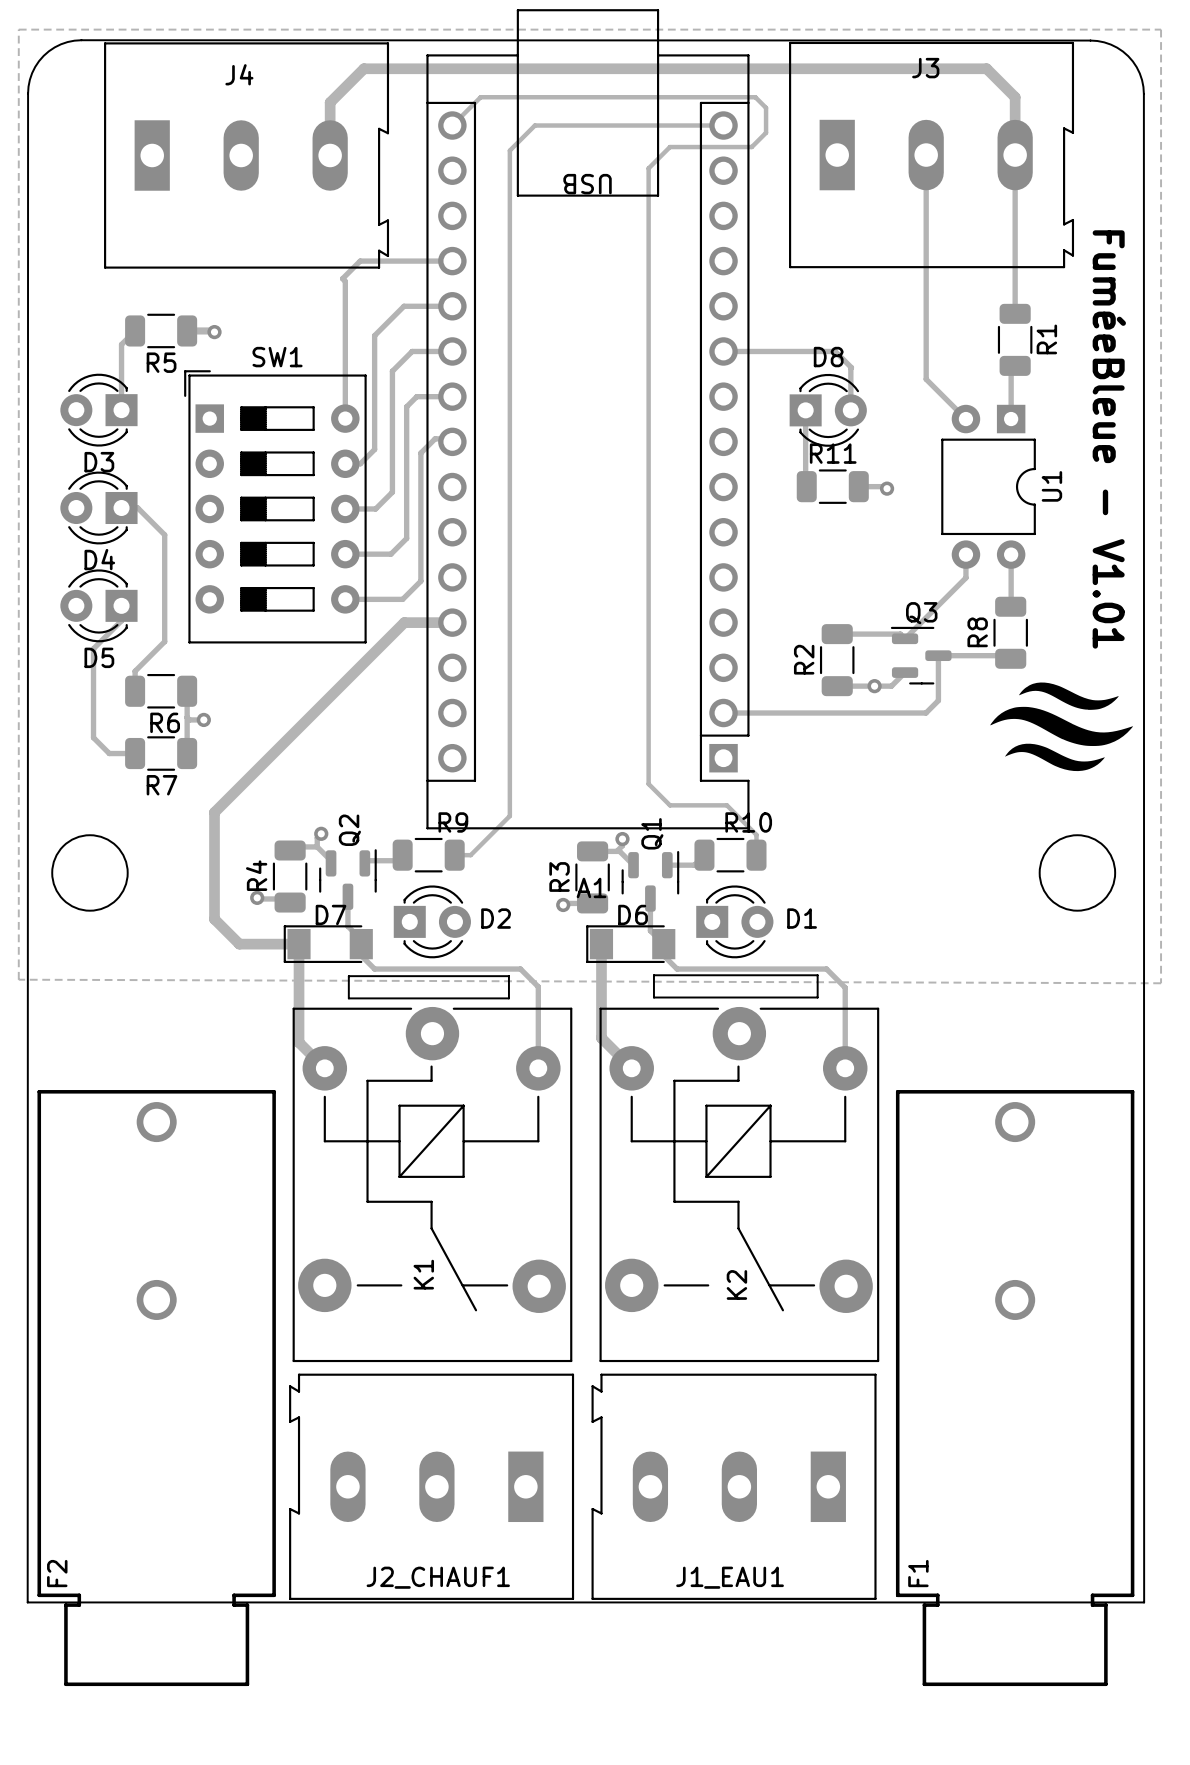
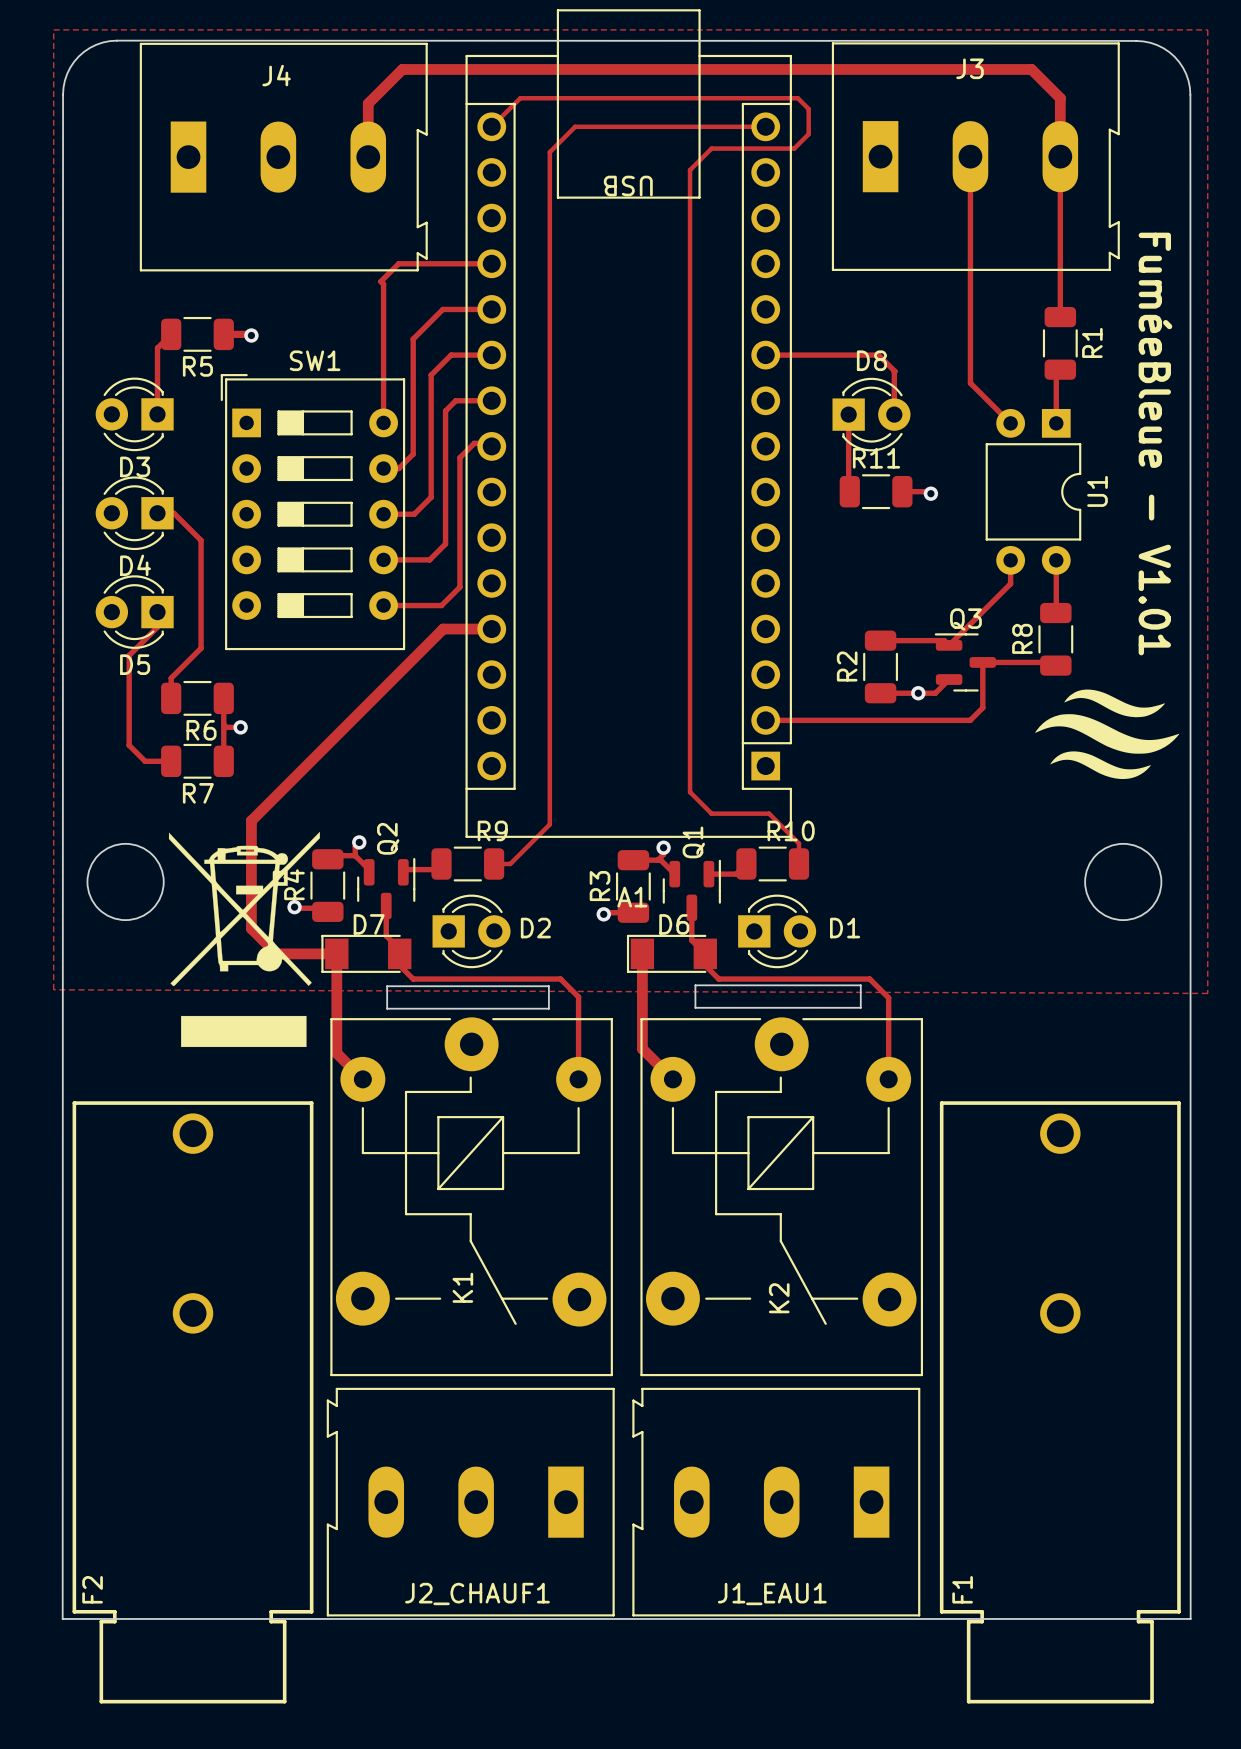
drawing: none -> [168, 831, 320, 1048]

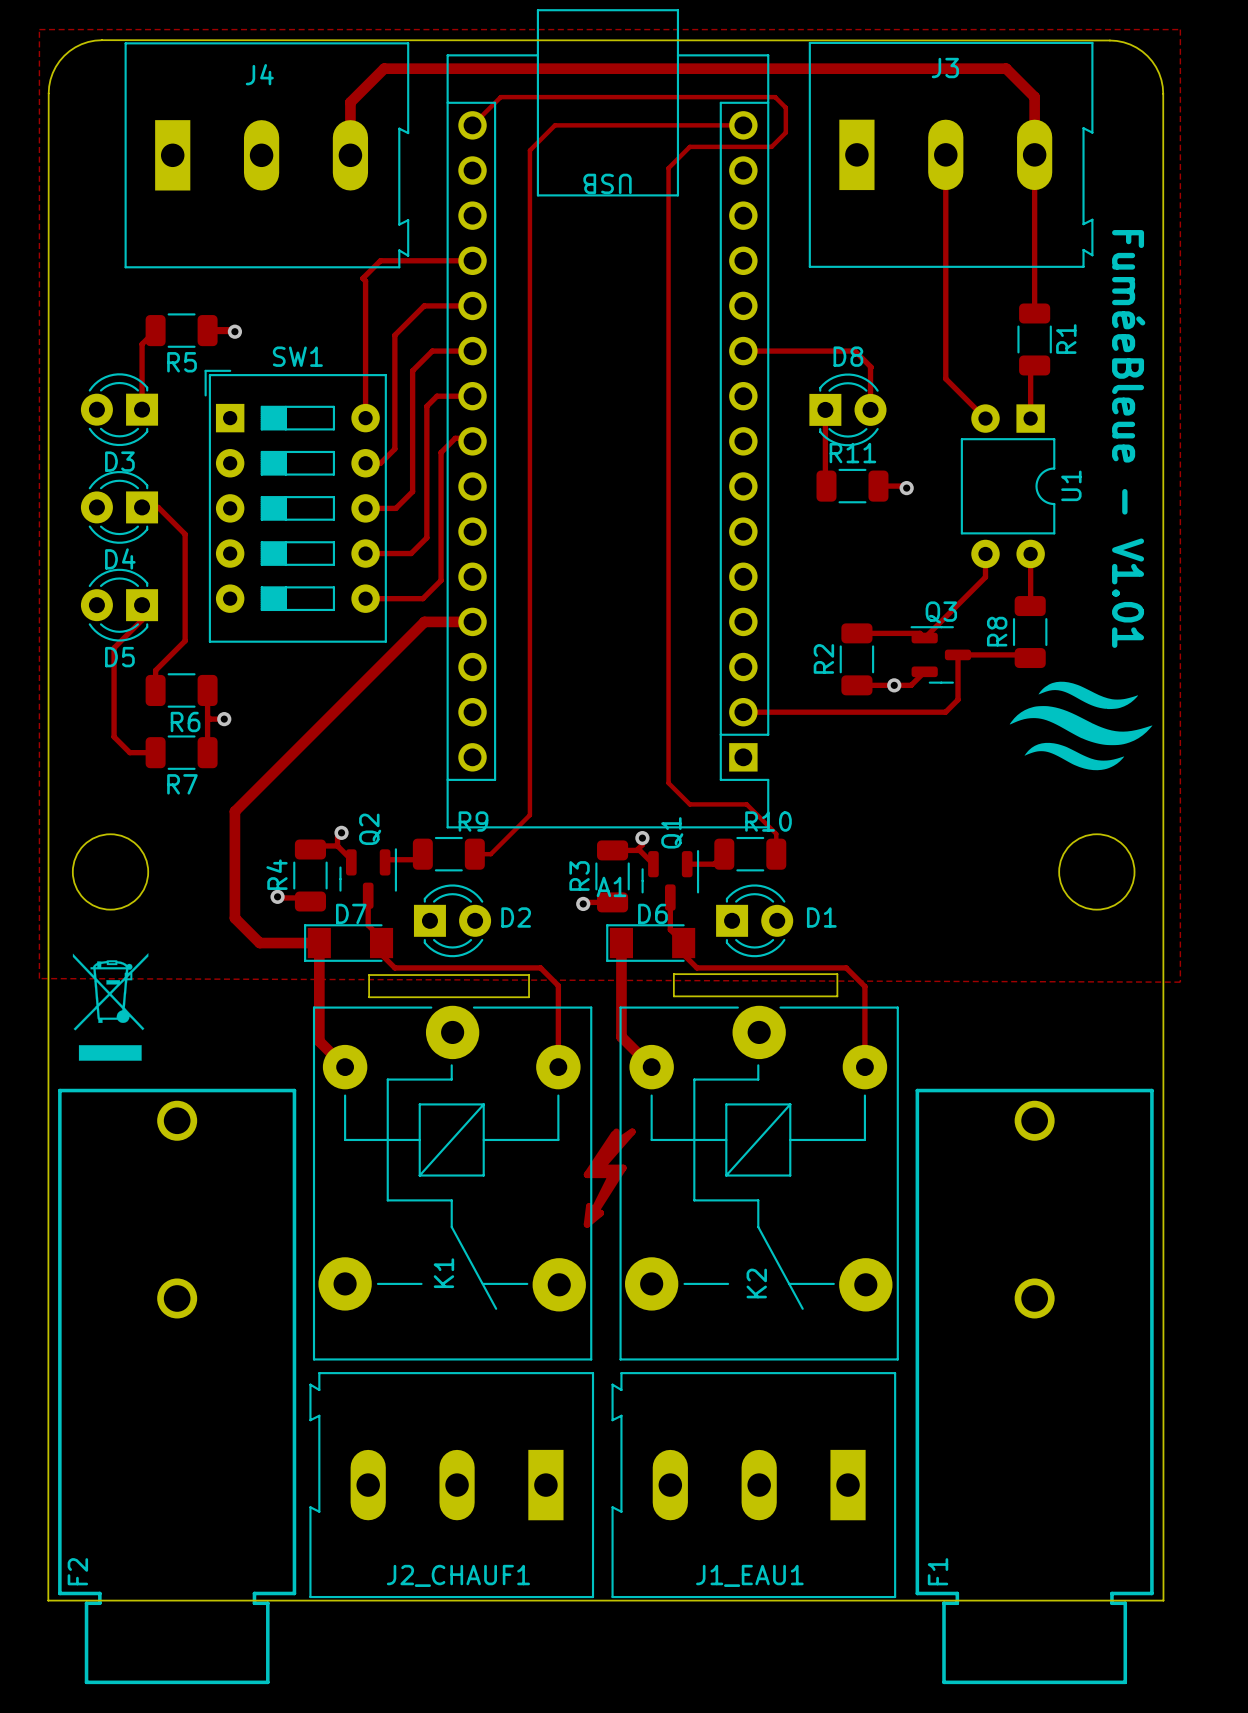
drawing: [168, 831, 320, 1048] -> none
drawing: none -> [72, 953, 149, 1061]
drawing: none -> [583, 1128, 636, 1228]

